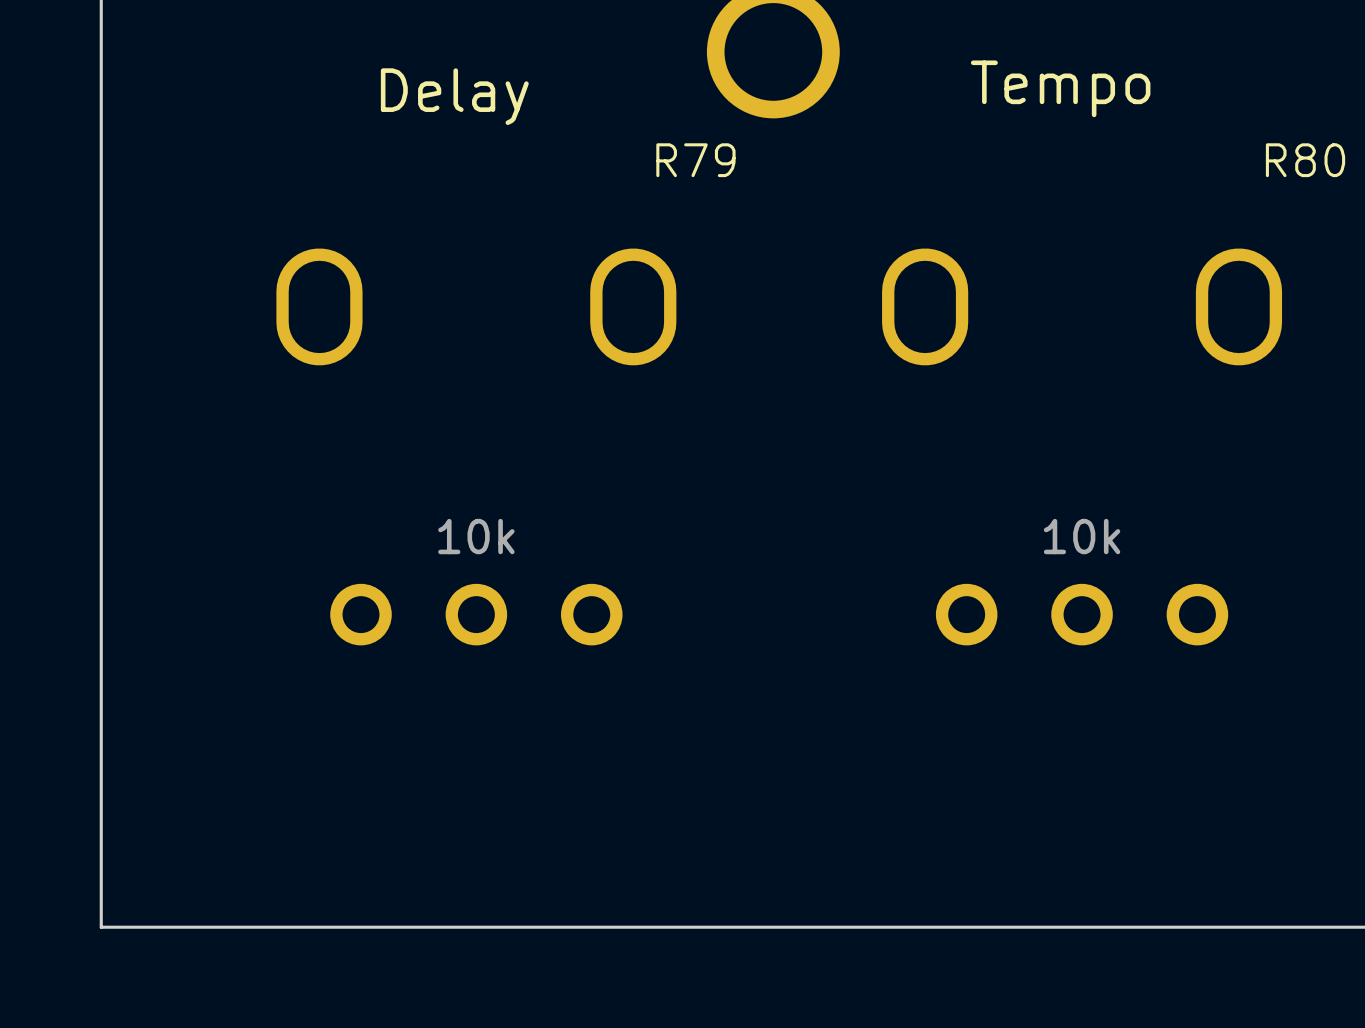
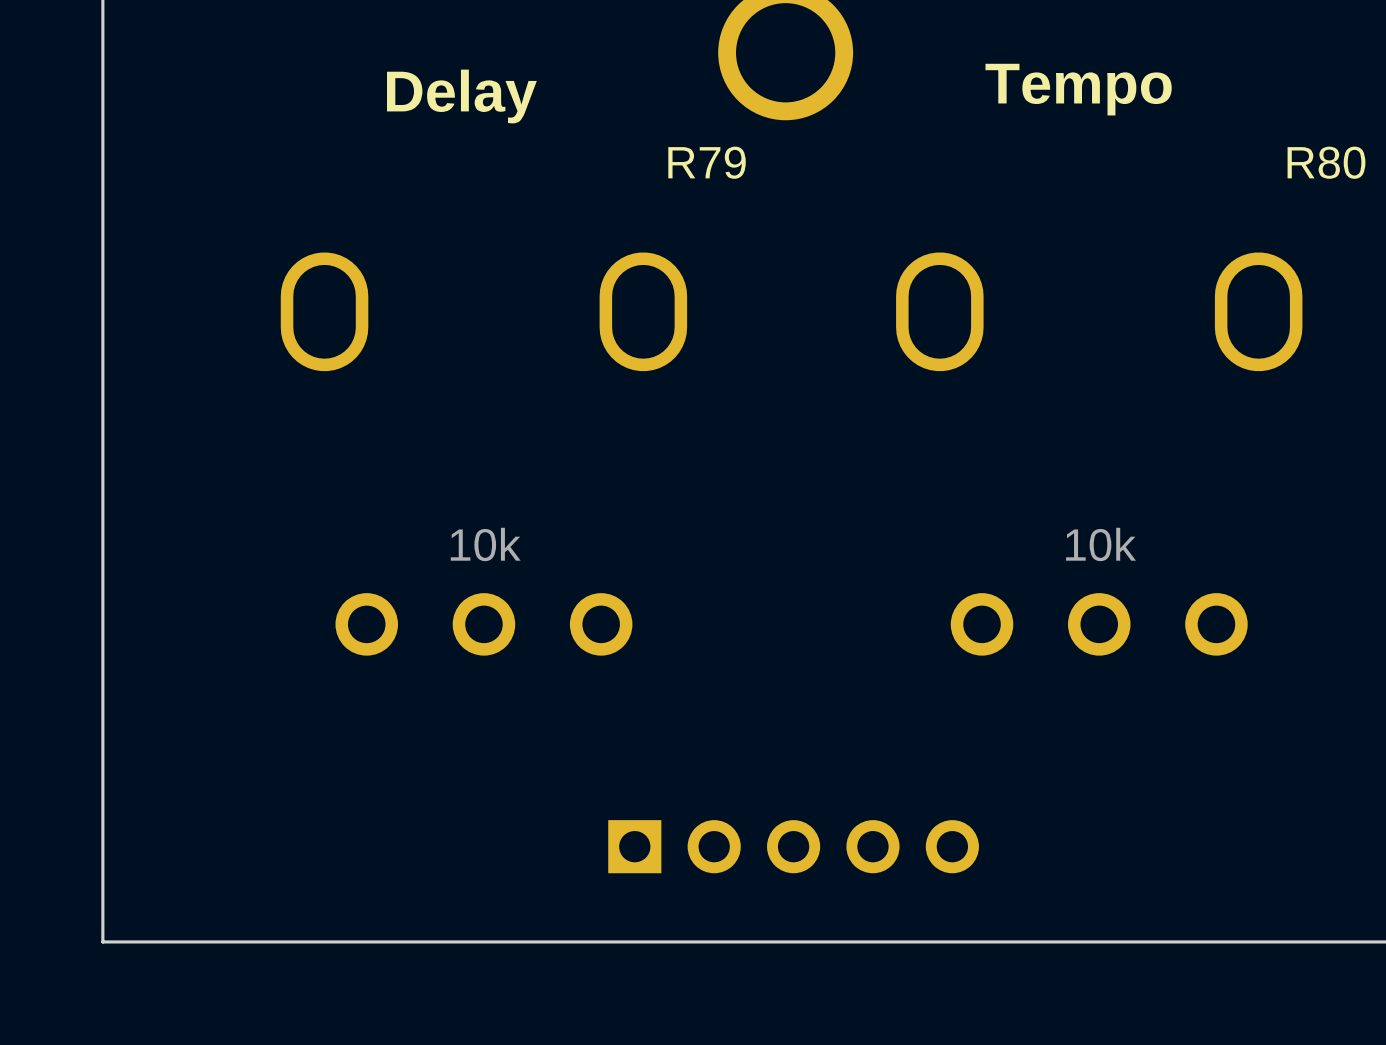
part: none -> (793, 846)

